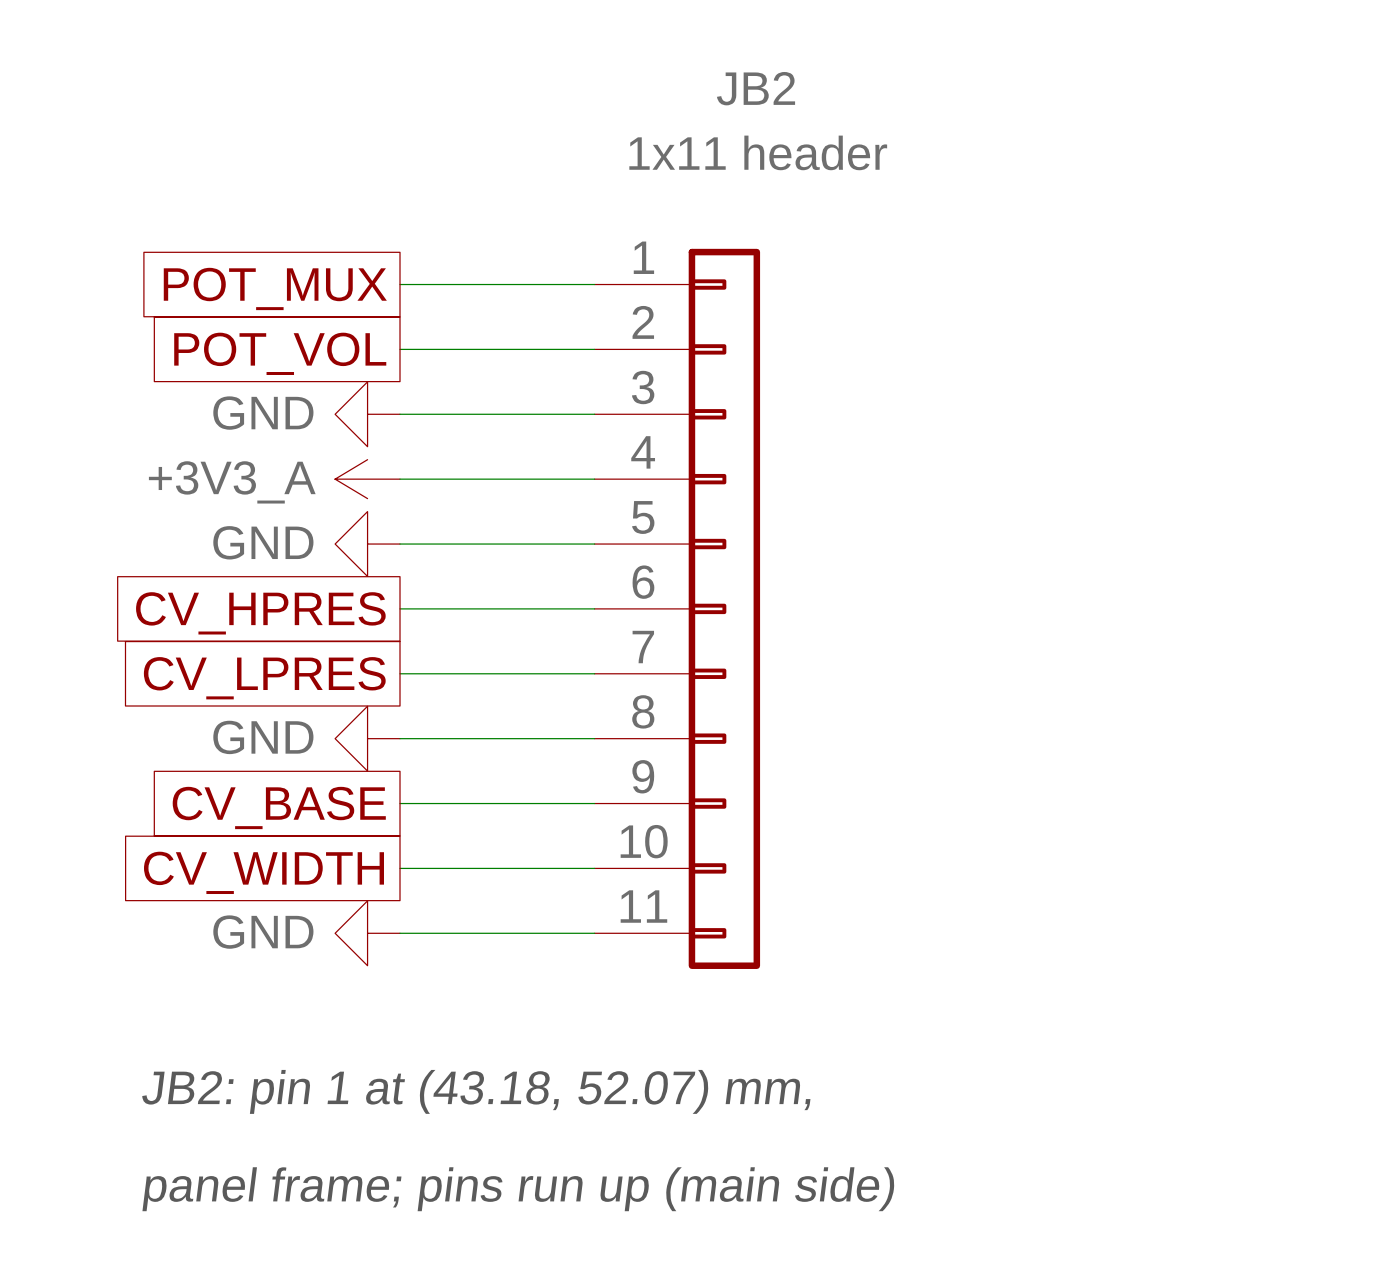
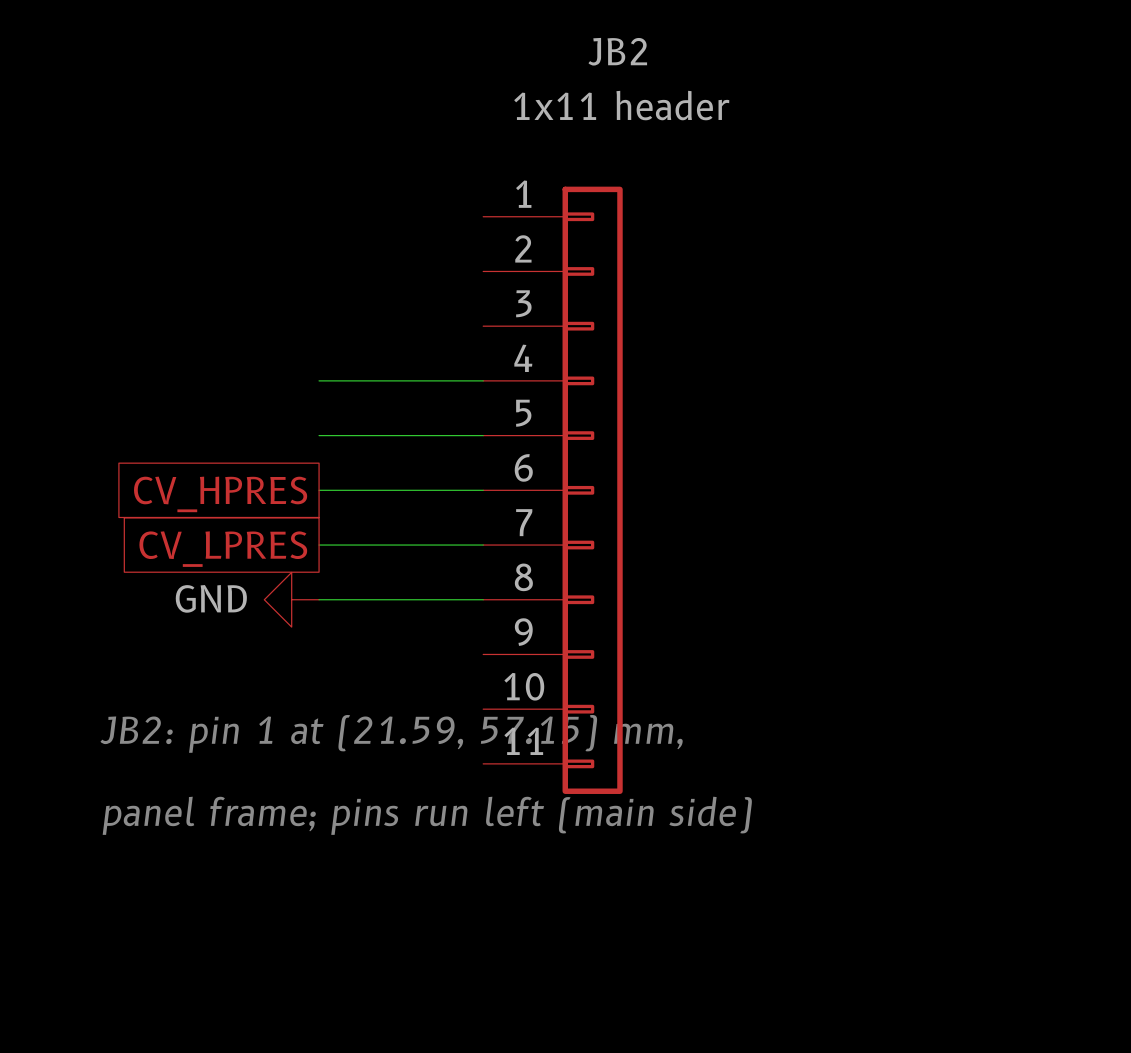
wire: (400, 284) (594, 284) -> none
global label: POT_MUX (275, 288) -> none
wire: (400, 349) (594, 349) -> none
global label: POT_VOL (280, 353) -> none
power symbol: GND (367, 414) -> none
wire: (400, 414) (594, 414) -> none
power symbol: +3V3_A (367, 479) -> none
power symbol: GND (367, 544) -> none
wire: (400, 803) (594, 803) -> none
global label: CV_BASE (279, 807) -> none
wire: (400, 868) (594, 868) -> none
global label: CV_WIDTH (263, 872) -> none
text: none -> JB2: pin 1 at (21.59, 57.15) mm, (391, 733)
power symbol: GND (367, 933) -> none
wire: (400, 933) (594, 933) -> none
text: none -> panel frame; pins run left (main side) (427, 815)
text: JB2: pin 1 at (43.18, 52.07) mm, (476, 1091) -> none
text: panel frame; pins run up (main side) (518, 1189) -> none

